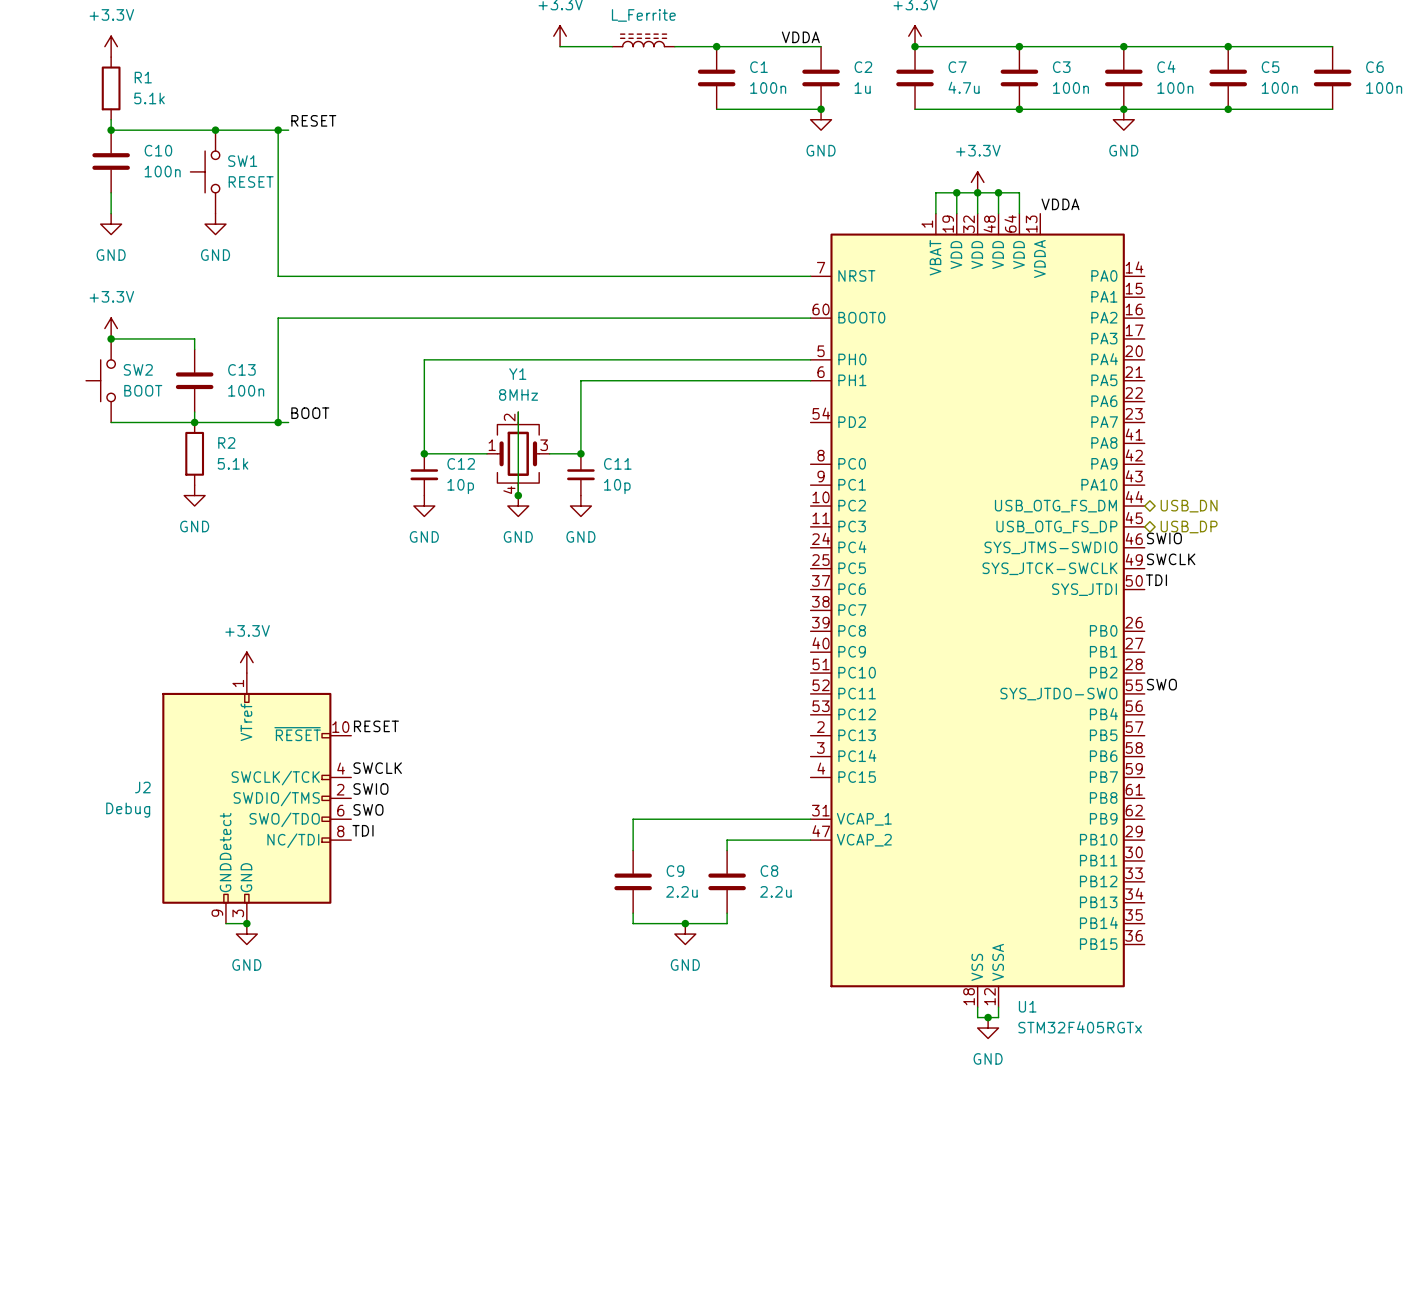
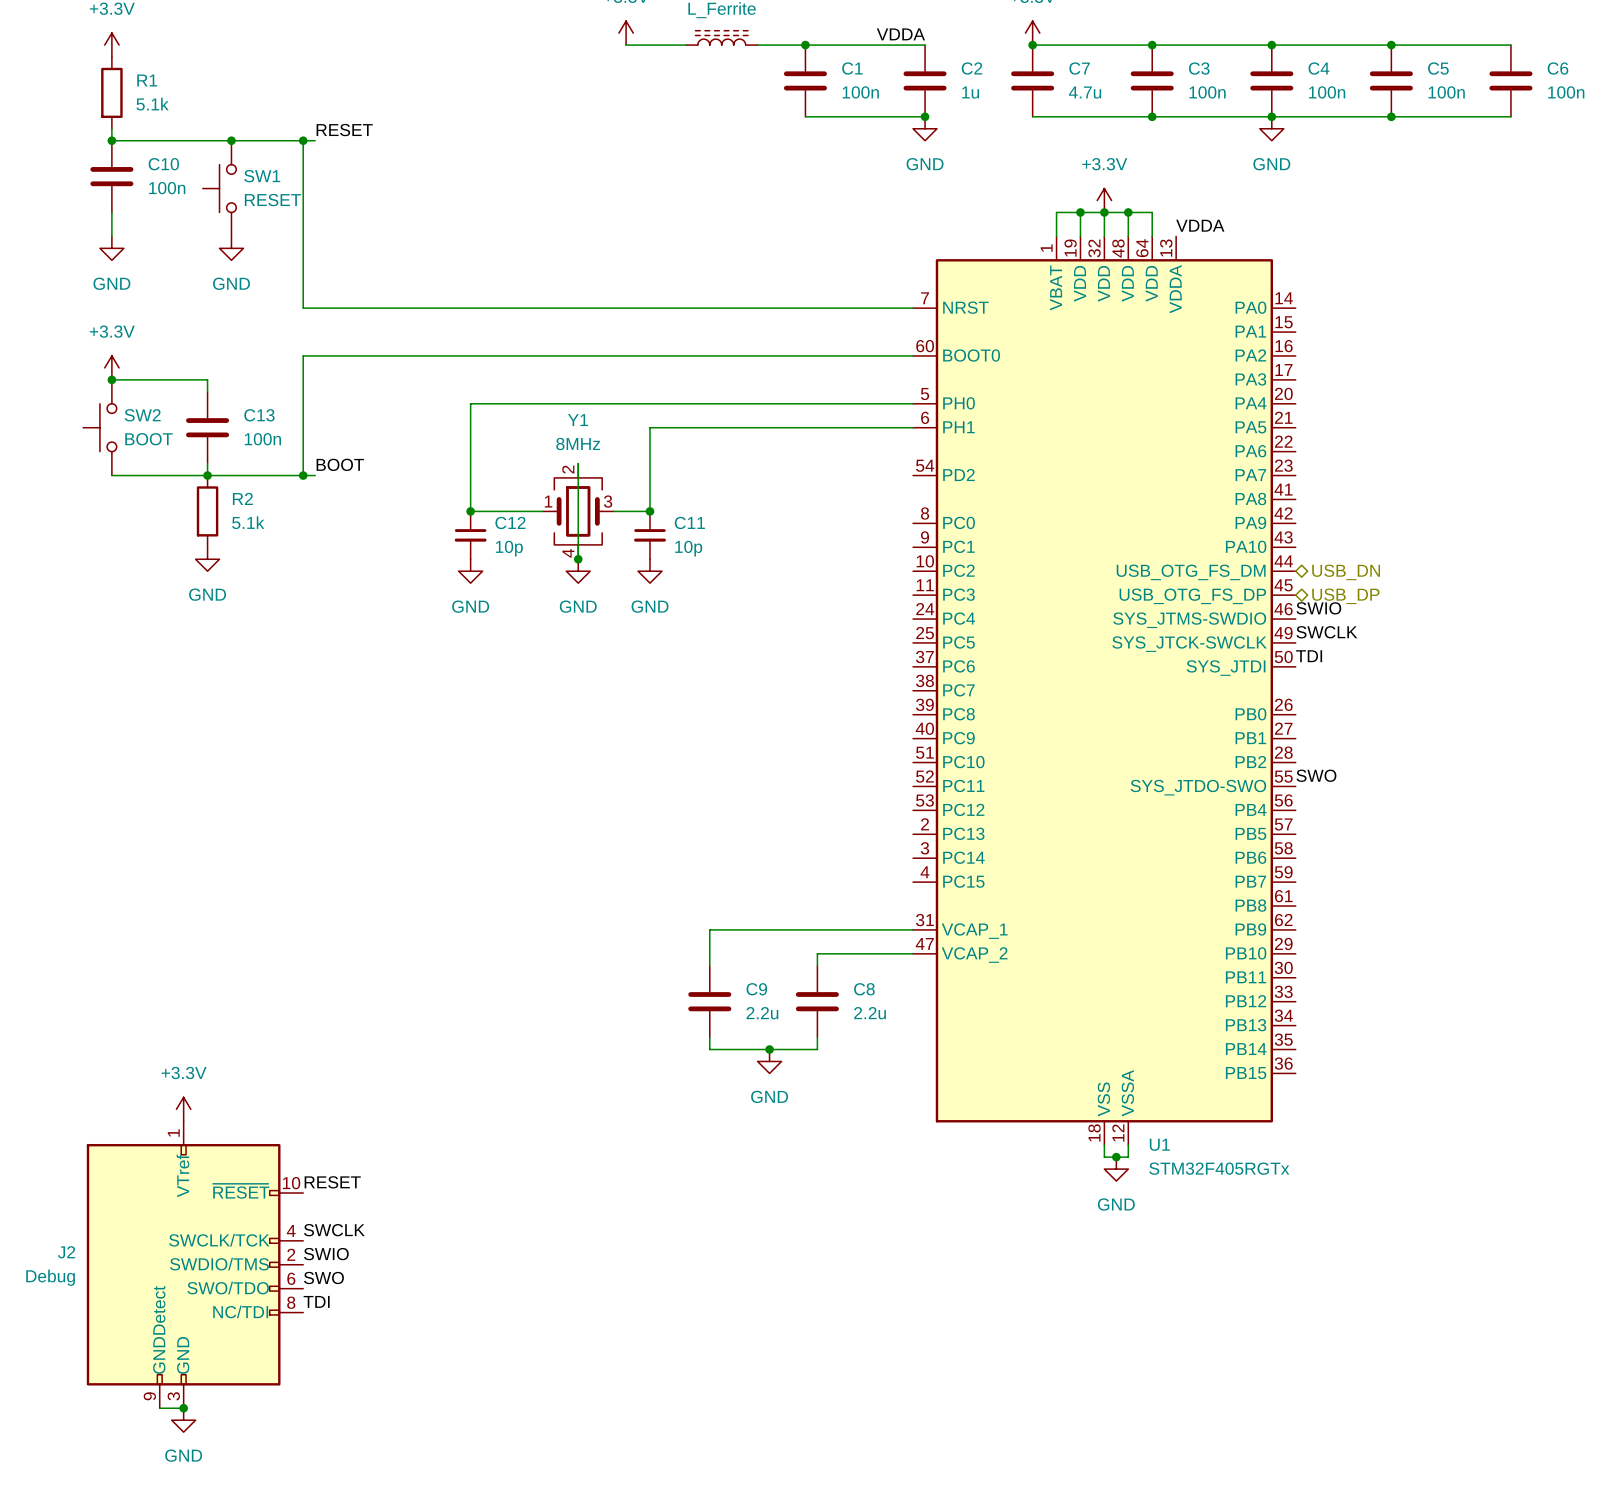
power symbol: +3.3V (246, 662) -> none
label: RESET (376, 726) -> none
label: SWCLK (377, 768) -> none
label: SWIO (370, 789) -> none
J2 position: (256, 798) -> (195, 1264)
label: SWO (368, 809) -> none
label: TDI (363, 830) -> none
wire: (225, 923) (246, 923) -> none
junction: (246, 923) -> none
power symbol: GND (246, 934) -> none
power symbol: none -> +3.3V (183, 1109)
label: none -> RESET (332, 1182)
label: none -> SWCLK (334, 1230)
label: none -> SWIO (326, 1254)
label: none -> SWO (323, 1277)
label: none -> TDI (316, 1301)
wire: none -> (159, 1408) (183, 1408)
junction: none -> (183, 1408)
power symbol: none -> GND (183, 1420)

